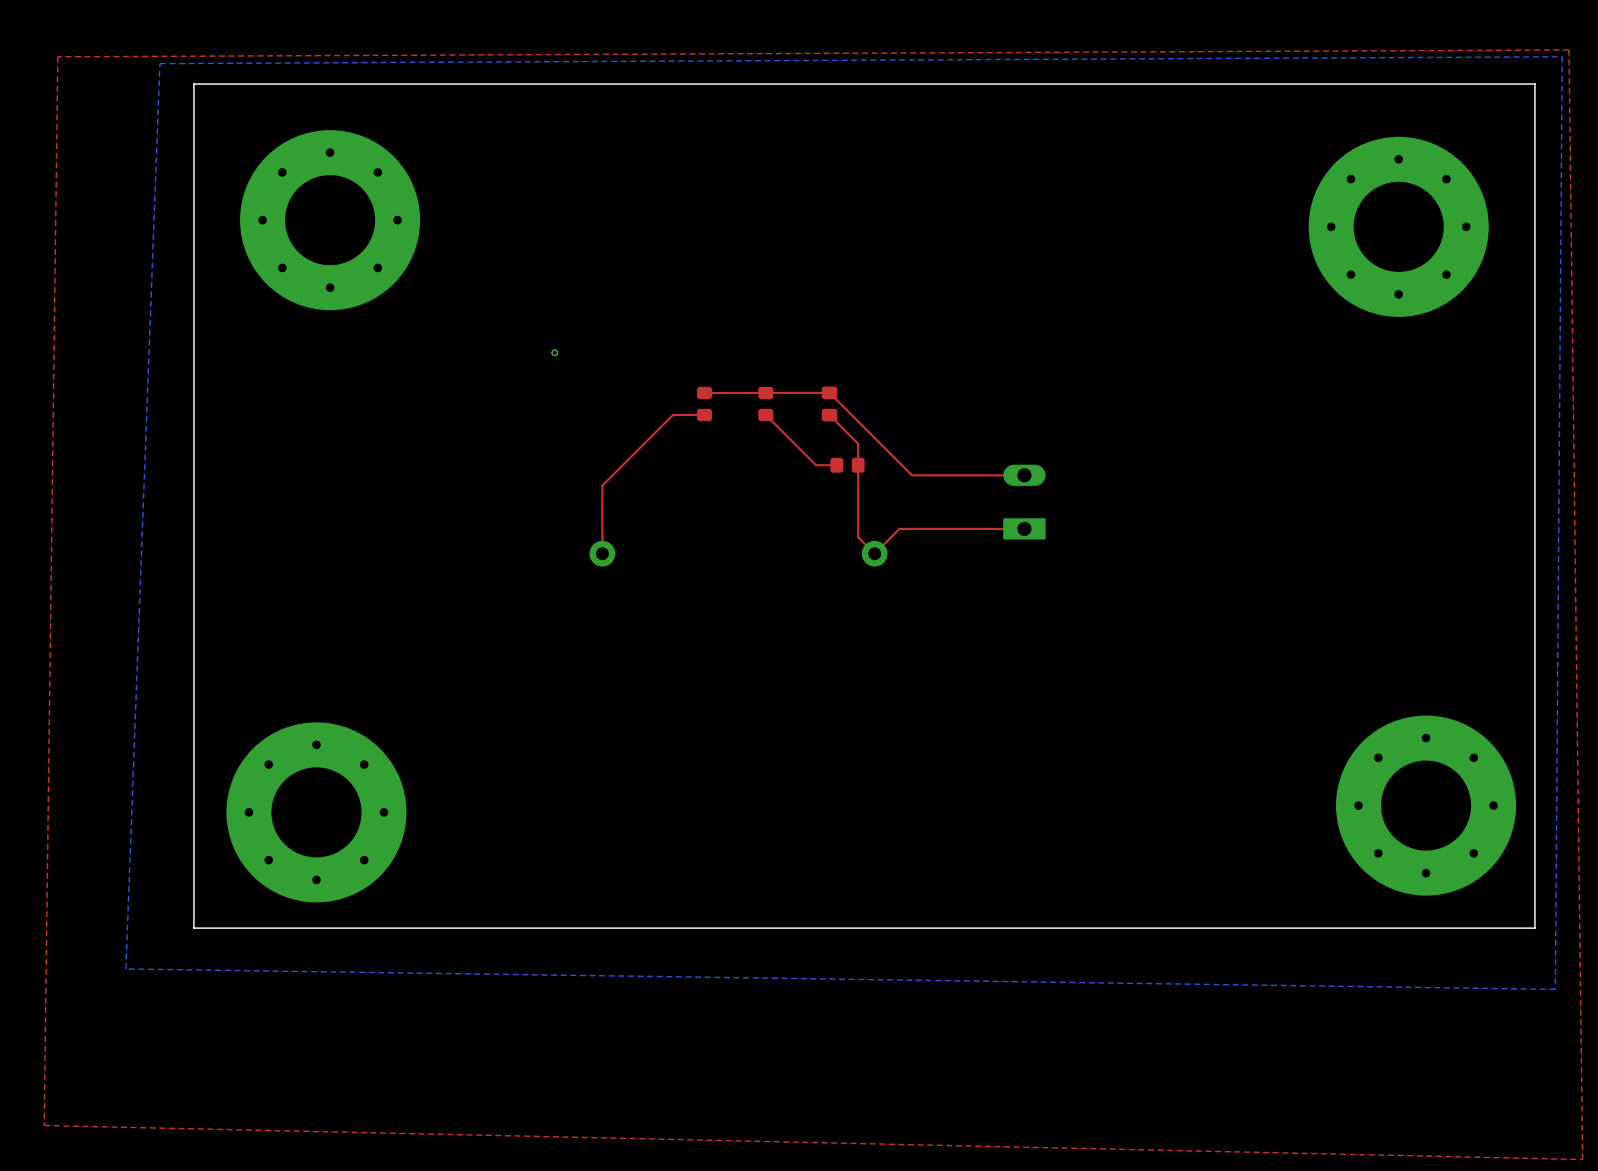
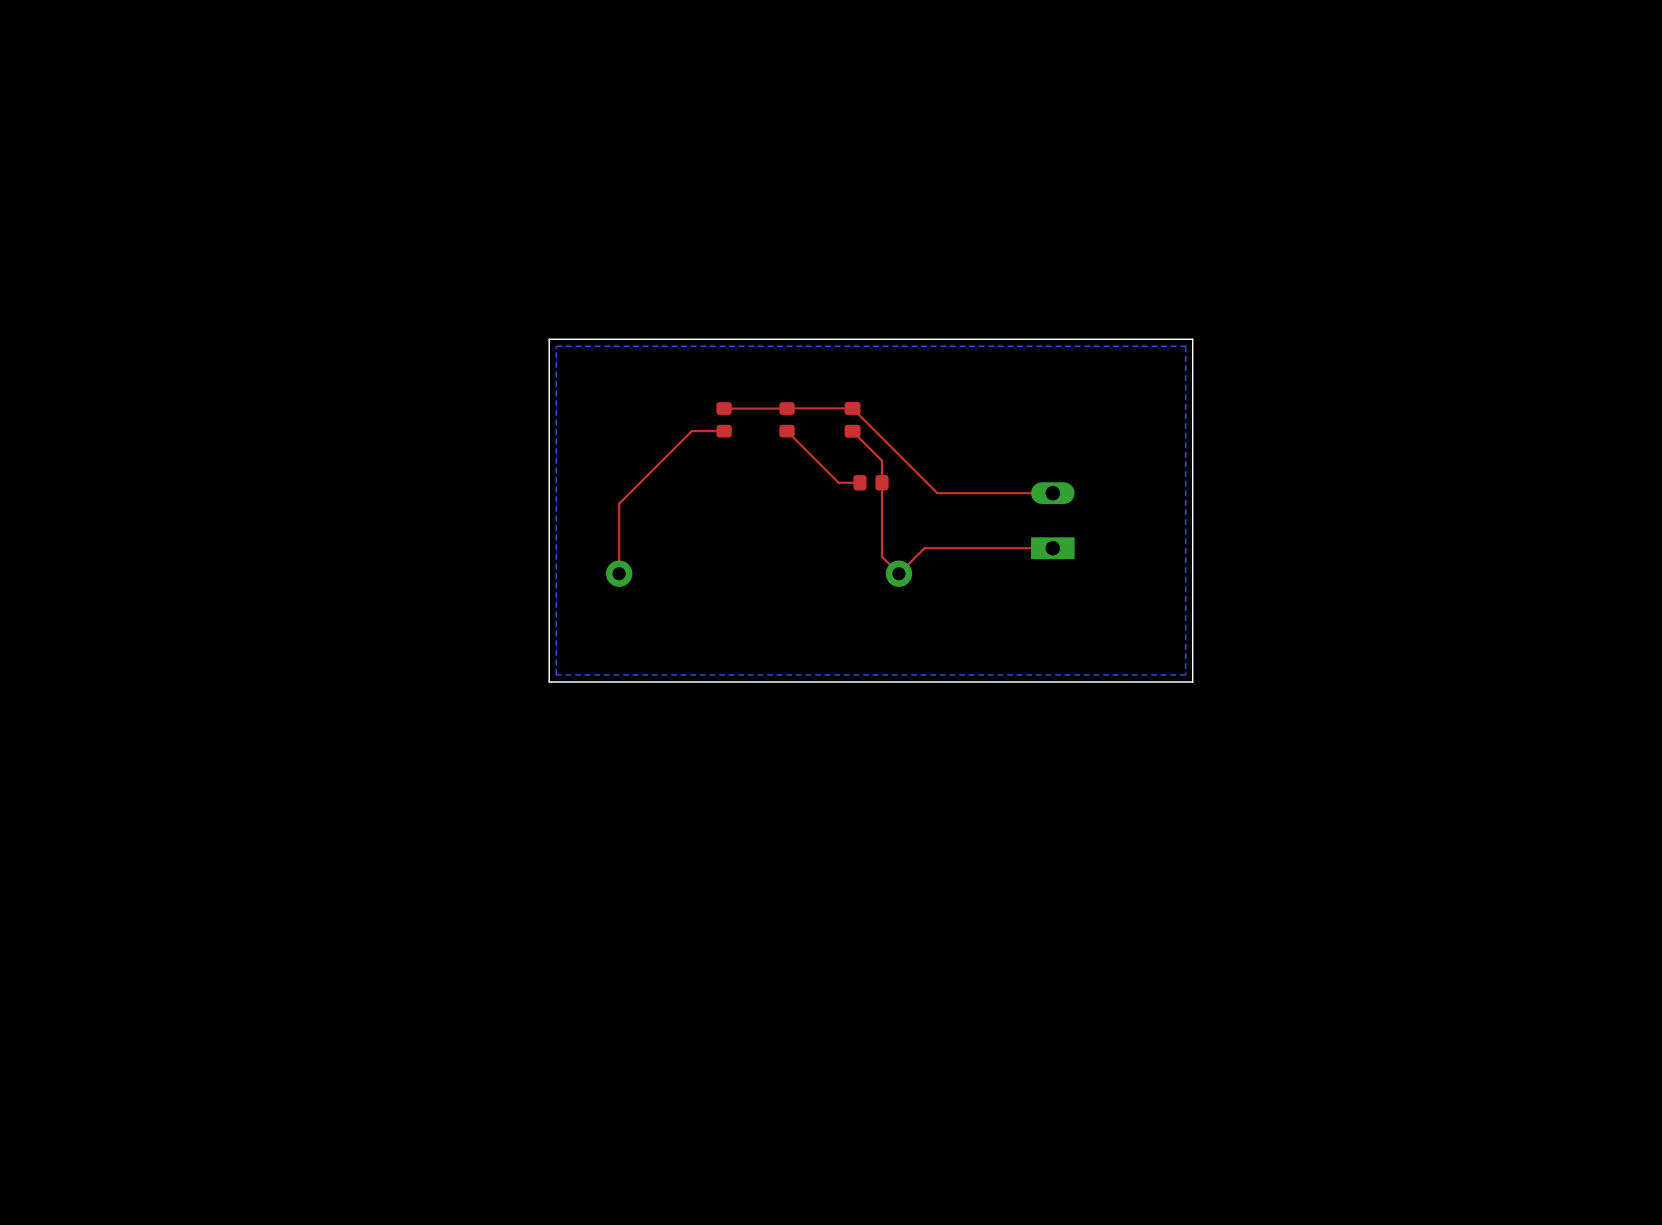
top zone outline: (1568, 49) (57, 56) (44, 1125) (1582, 1159) (1568, 49) -> none
bottom zone outline: (1562, 56) (1555, 989) (125, 968) (159, 63) (1562, 56) -> none
board edge: (1534, 84) (193, 84) (193, 928) (1534, 928) (1534, 84) -> none
part: (330, 220) -> none
part: (1398, 226) -> none
board edge: none -> (1192, 339) (549, 339) (549, 681) (1192, 681) (1192, 339)
bottom zone outline: none -> (1185, 346) (1185, 674) (556, 674) (556, 346) (1185, 346)
via: (554, 352) -> none
part: (1426, 805) -> none
part: (316, 812) -> none

